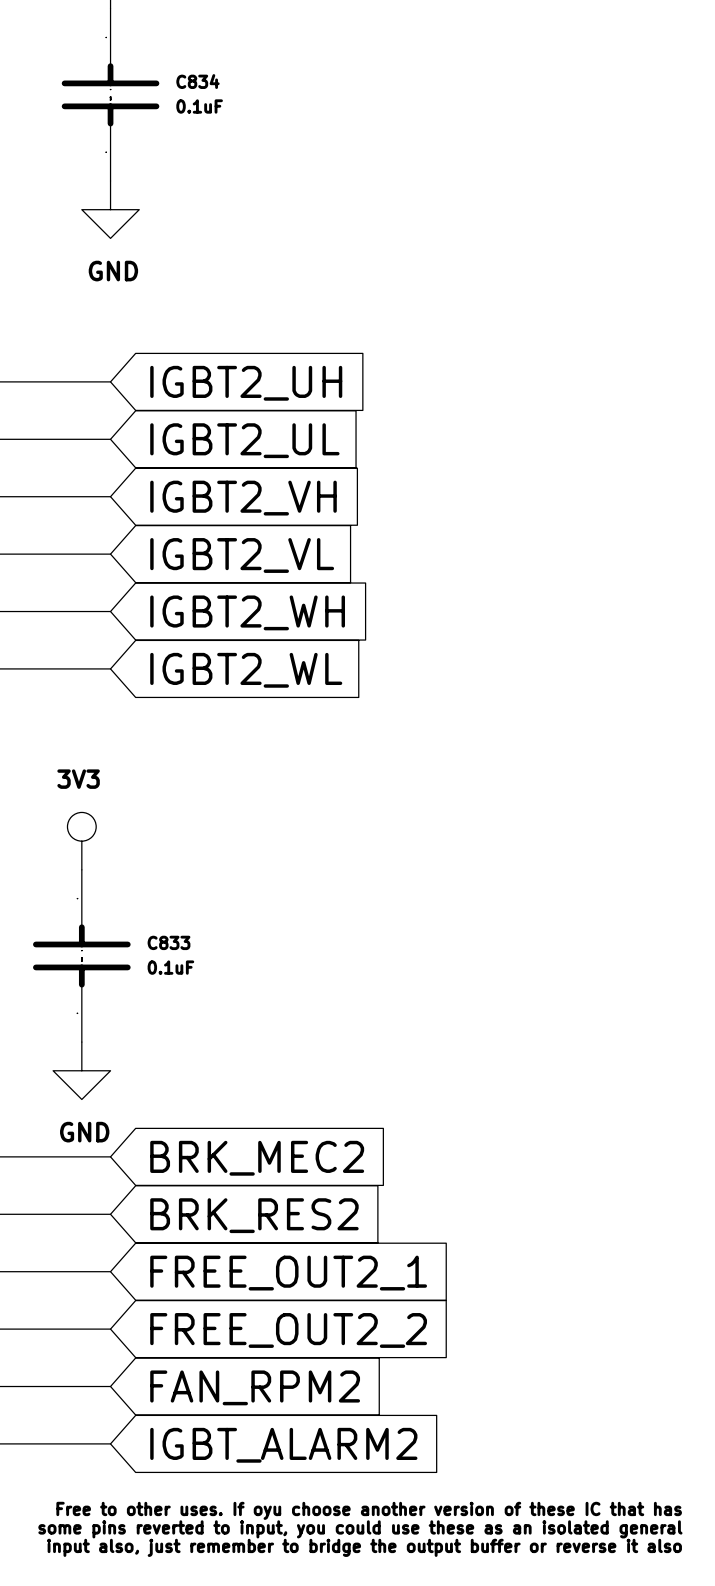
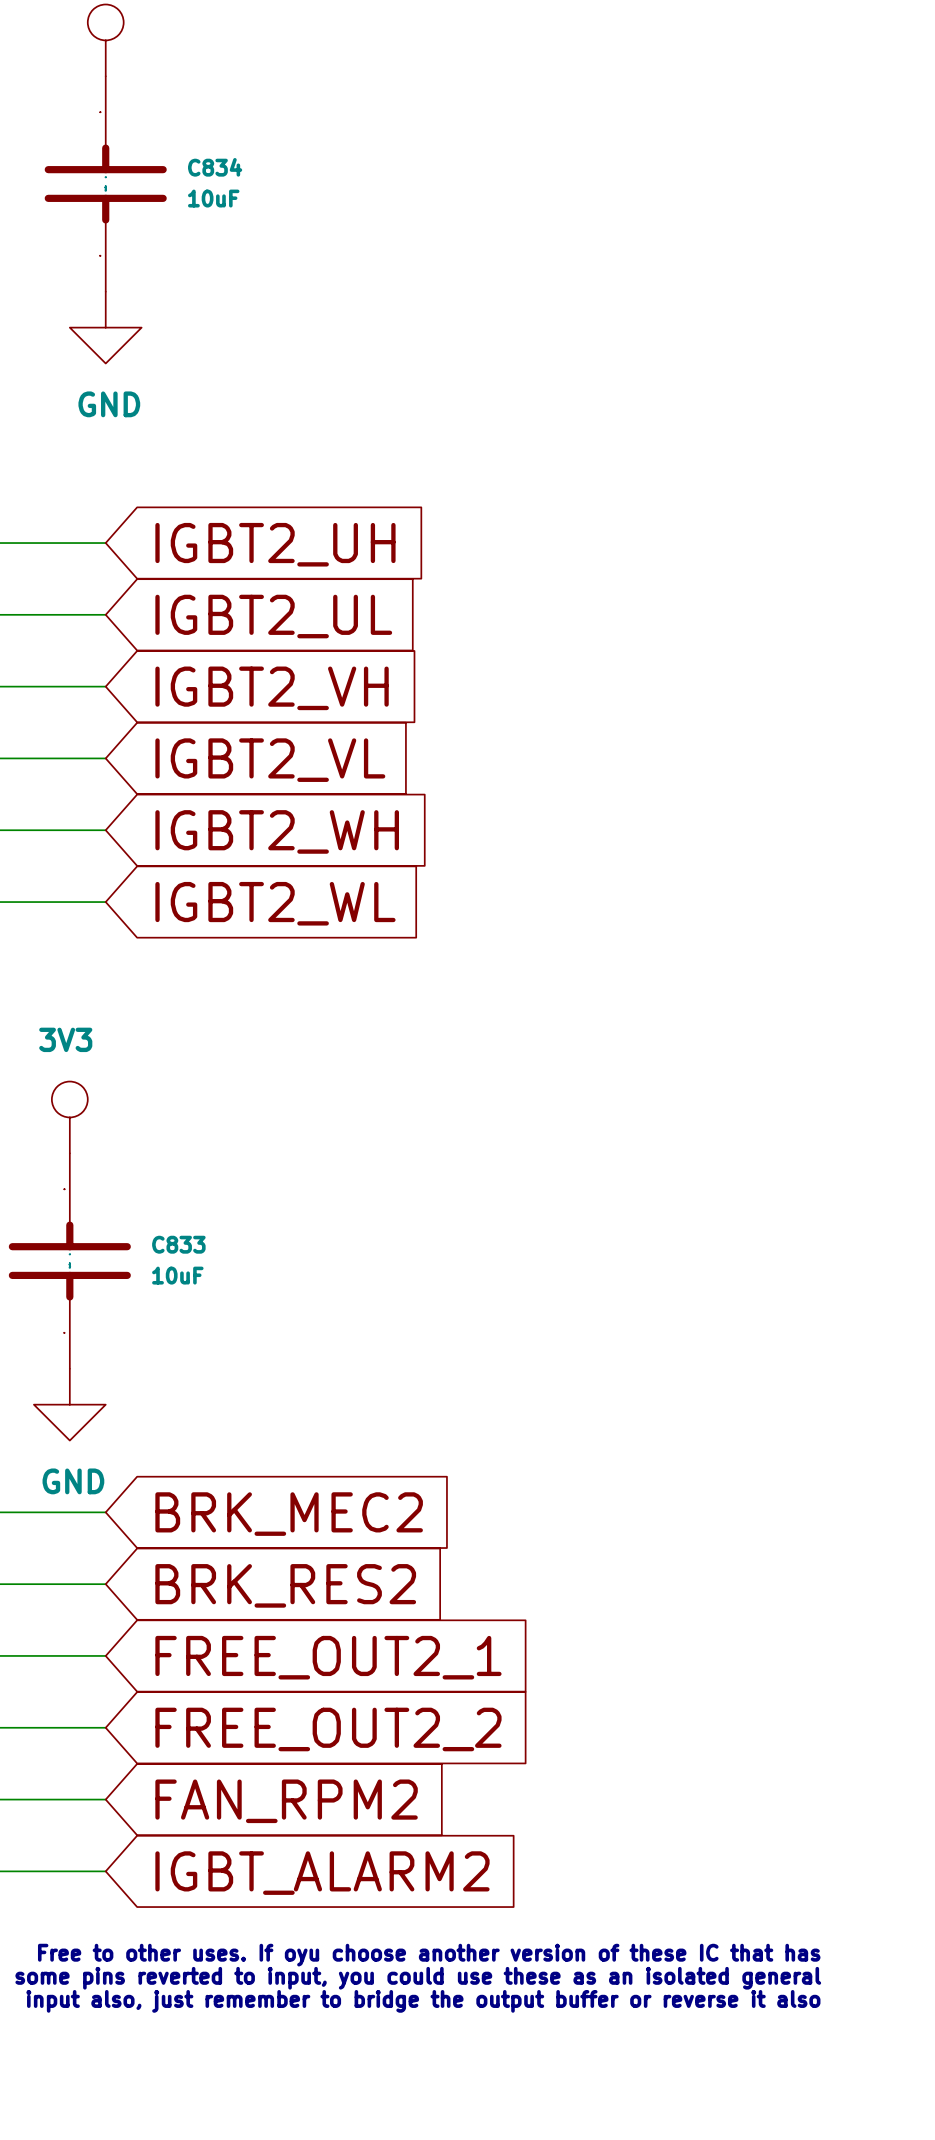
C834 value: 0.1uF (199, 106) -> 10uF (213, 198)
C833 value: 0.1uF (170, 967) -> 10uF (177, 1275)

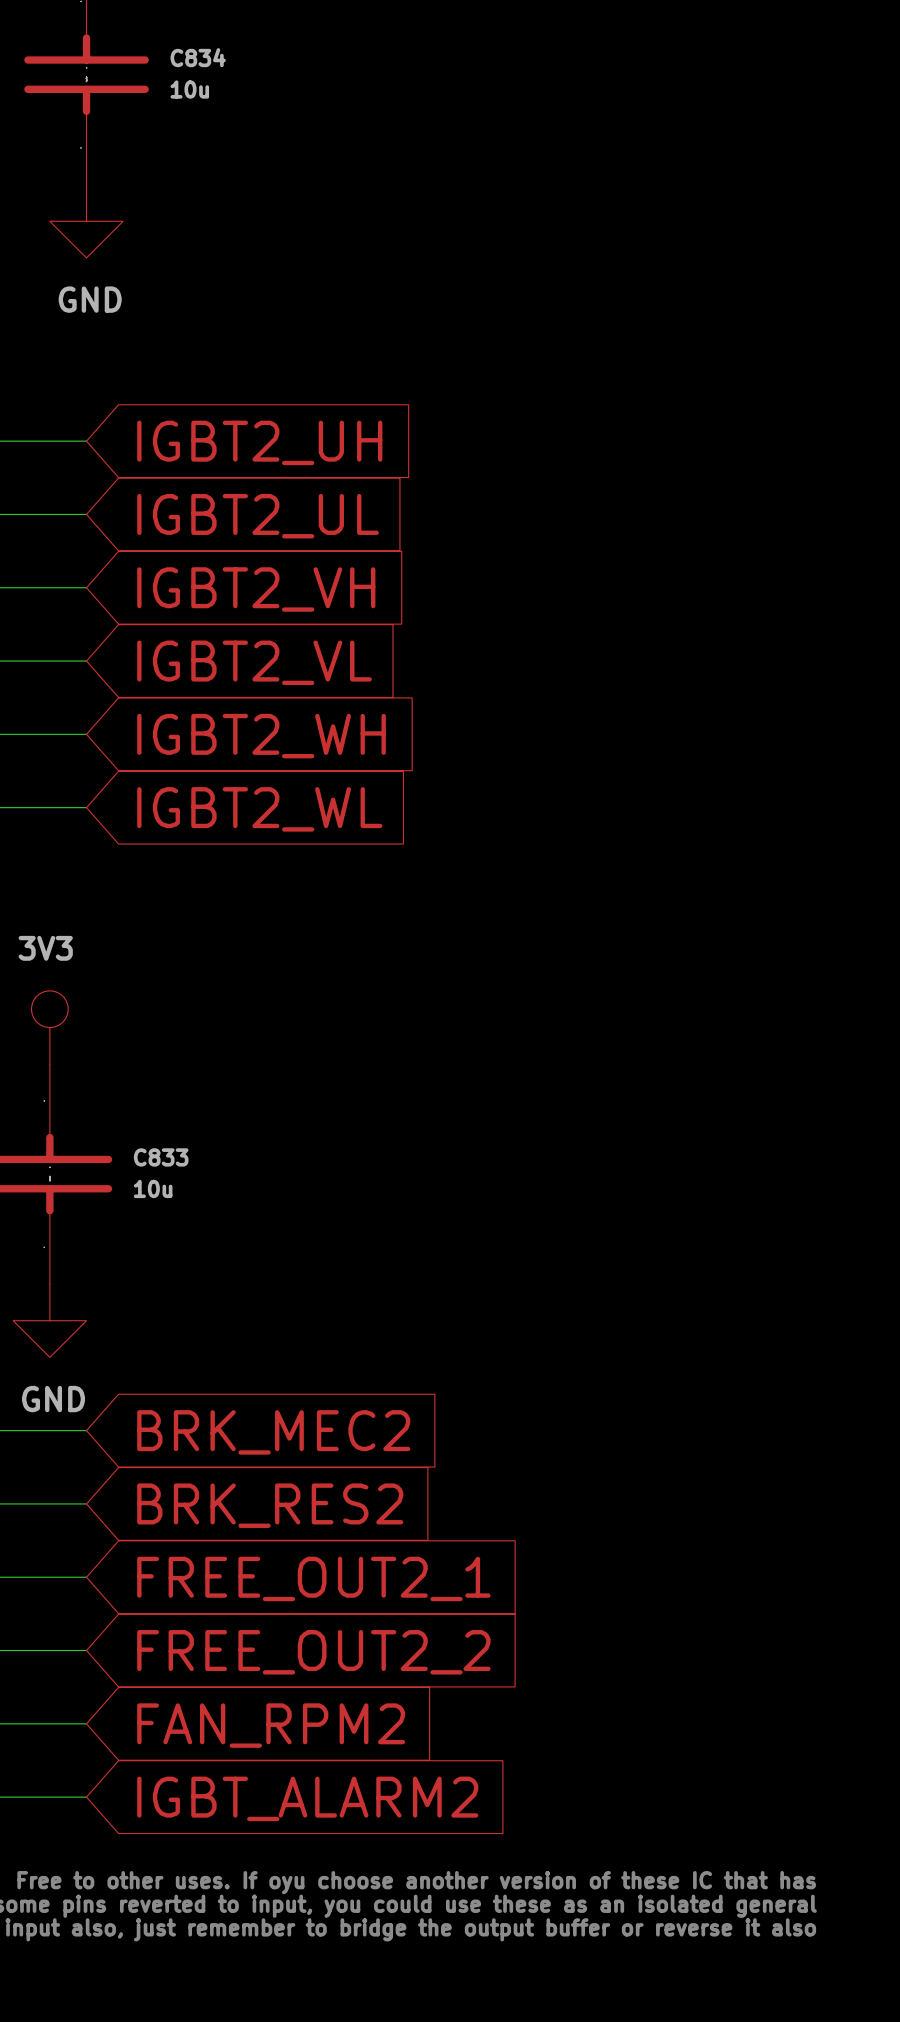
C834 value: 10uF (213, 198) -> 10u (189, 89)
C833 value: 10uF (177, 1275) -> 10u (153, 1188)

